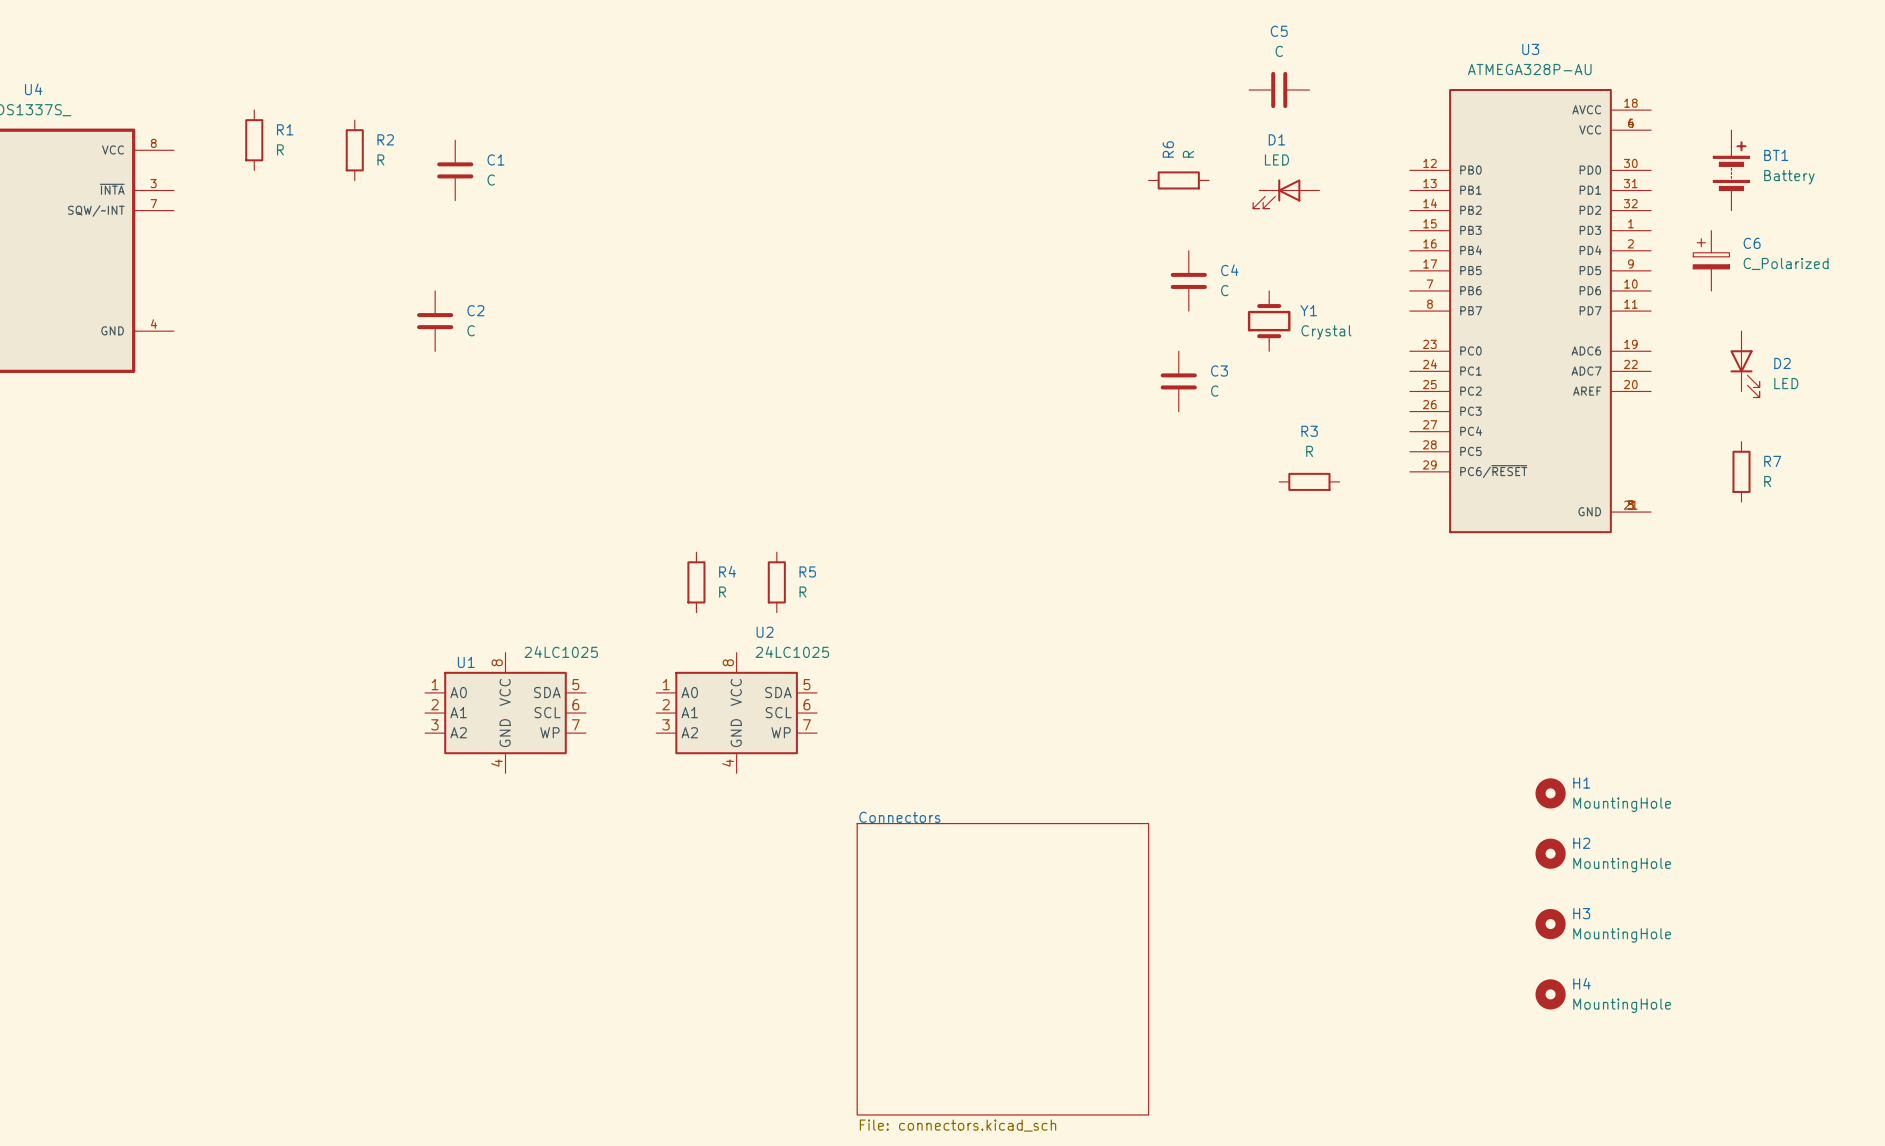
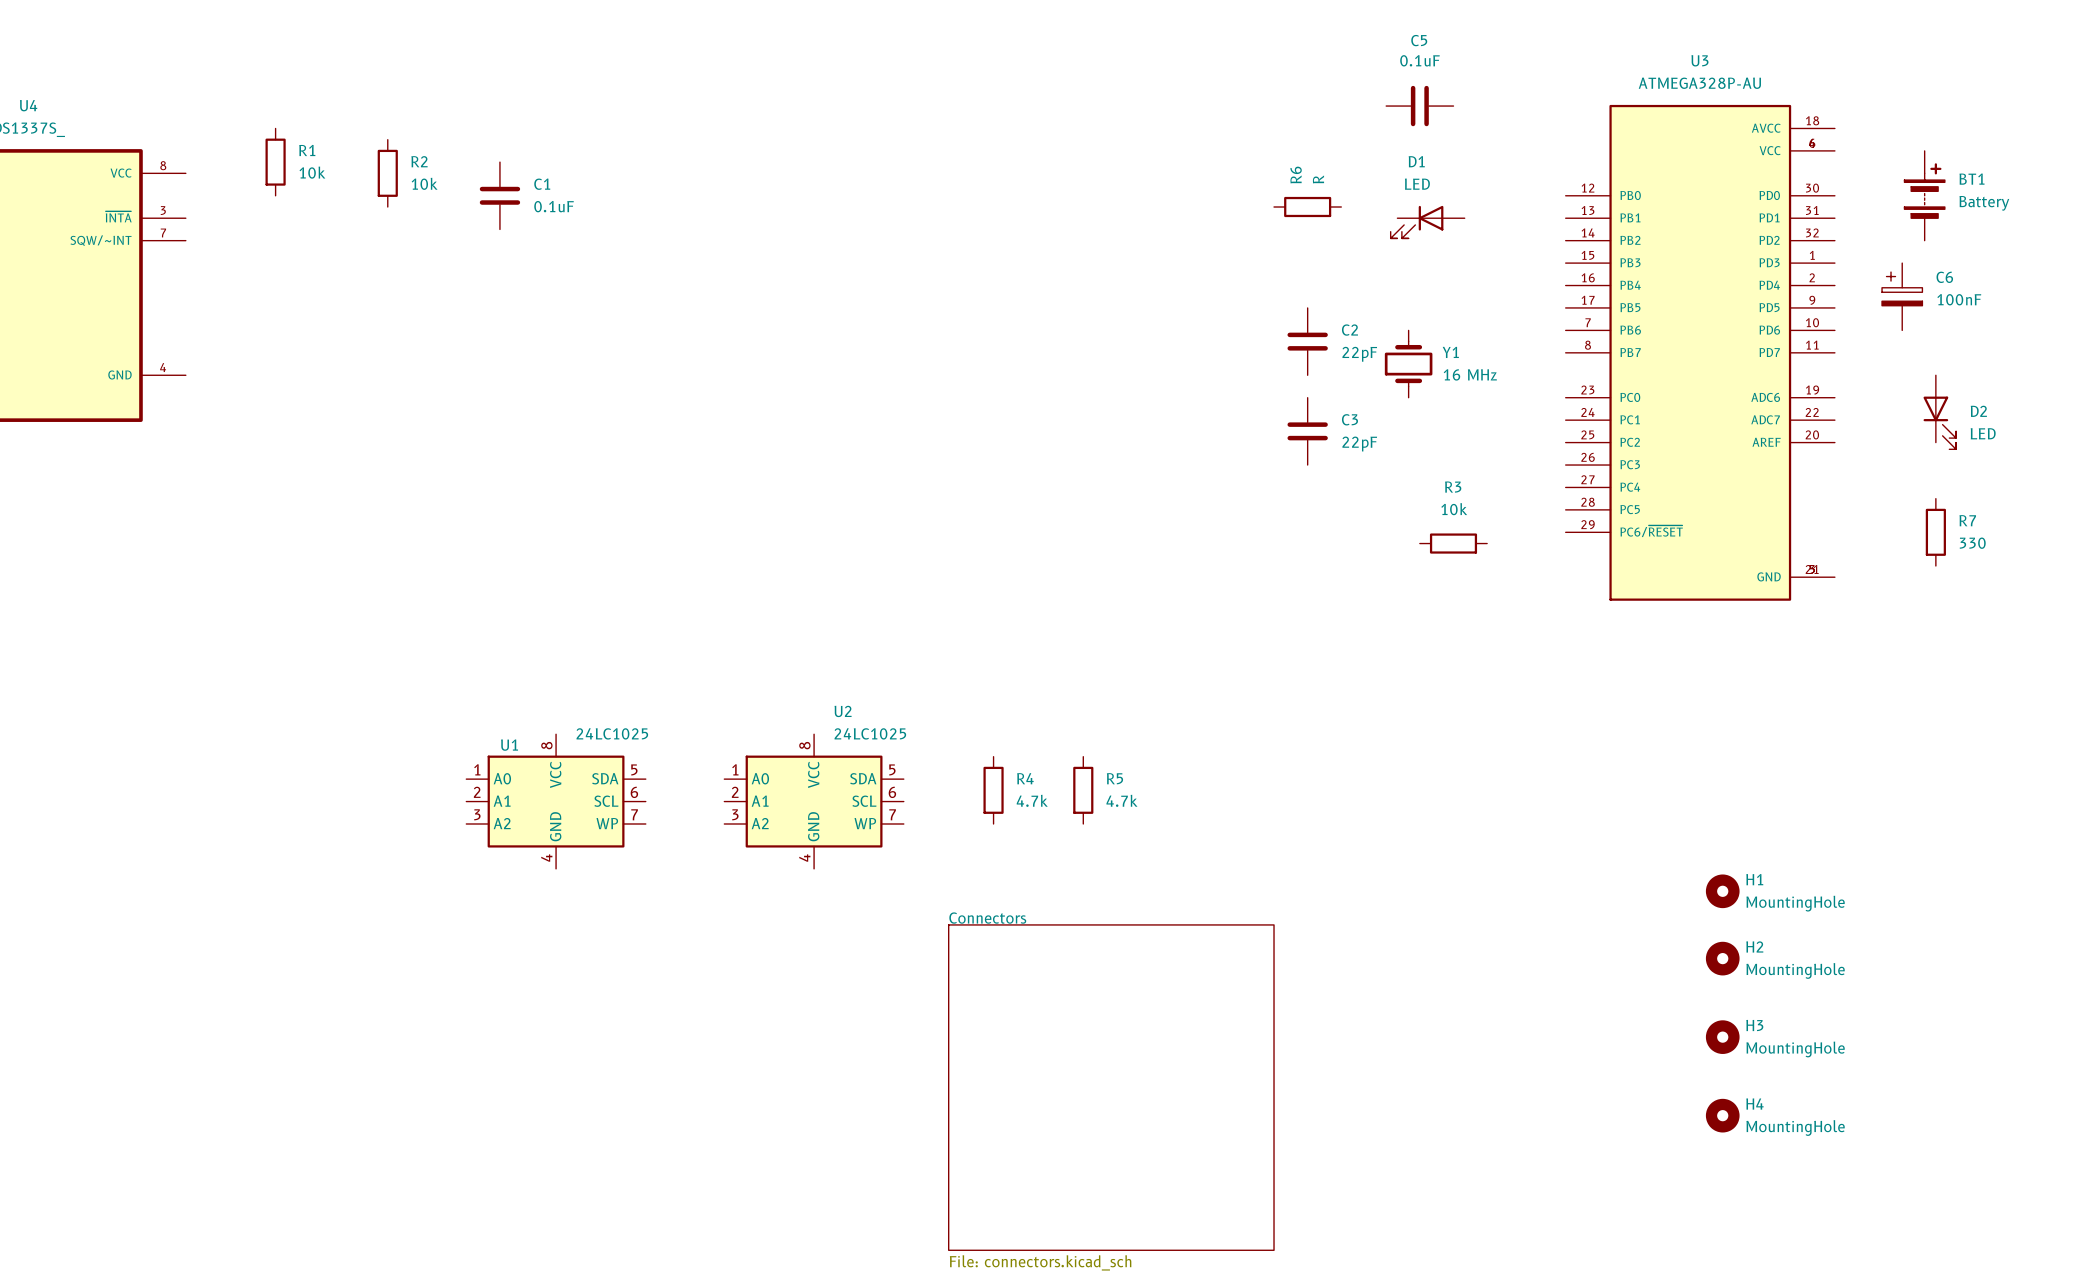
C5 value: C (1279, 51) -> 0.1uF (1419, 60)
R1 value: R (280, 149) -> 10k (312, 172)
R2 value: R (380, 159) -> 10k (424, 183)
C1 value: C (491, 180) -> 0.1uF (554, 206)
C6 value: C_Polarized (1786, 263) -> 100nF (1959, 299)
C4: C (1188, 280) -> none
C2 position: (435, 321) -> (1307, 341)
C2 value: C (471, 330) -> 22pF (1359, 354)
Y1 value: Crystal (1326, 332) -> 16 MHz (1470, 374)
C3 value: C (1214, 391) -> 22pF (1359, 444)
R3 value: R (1309, 451) -> 10k (1454, 509)
R7 value: R (1767, 481) -> 330 (1972, 543)
R4 position: (696, 582) -> (993, 790)
R5 position: (776, 582) -> (1083, 790)
R4 value: R (722, 592) -> 4.7k (1032, 800)
R5 value: R (802, 592) -> 4.7k (1121, 800)

